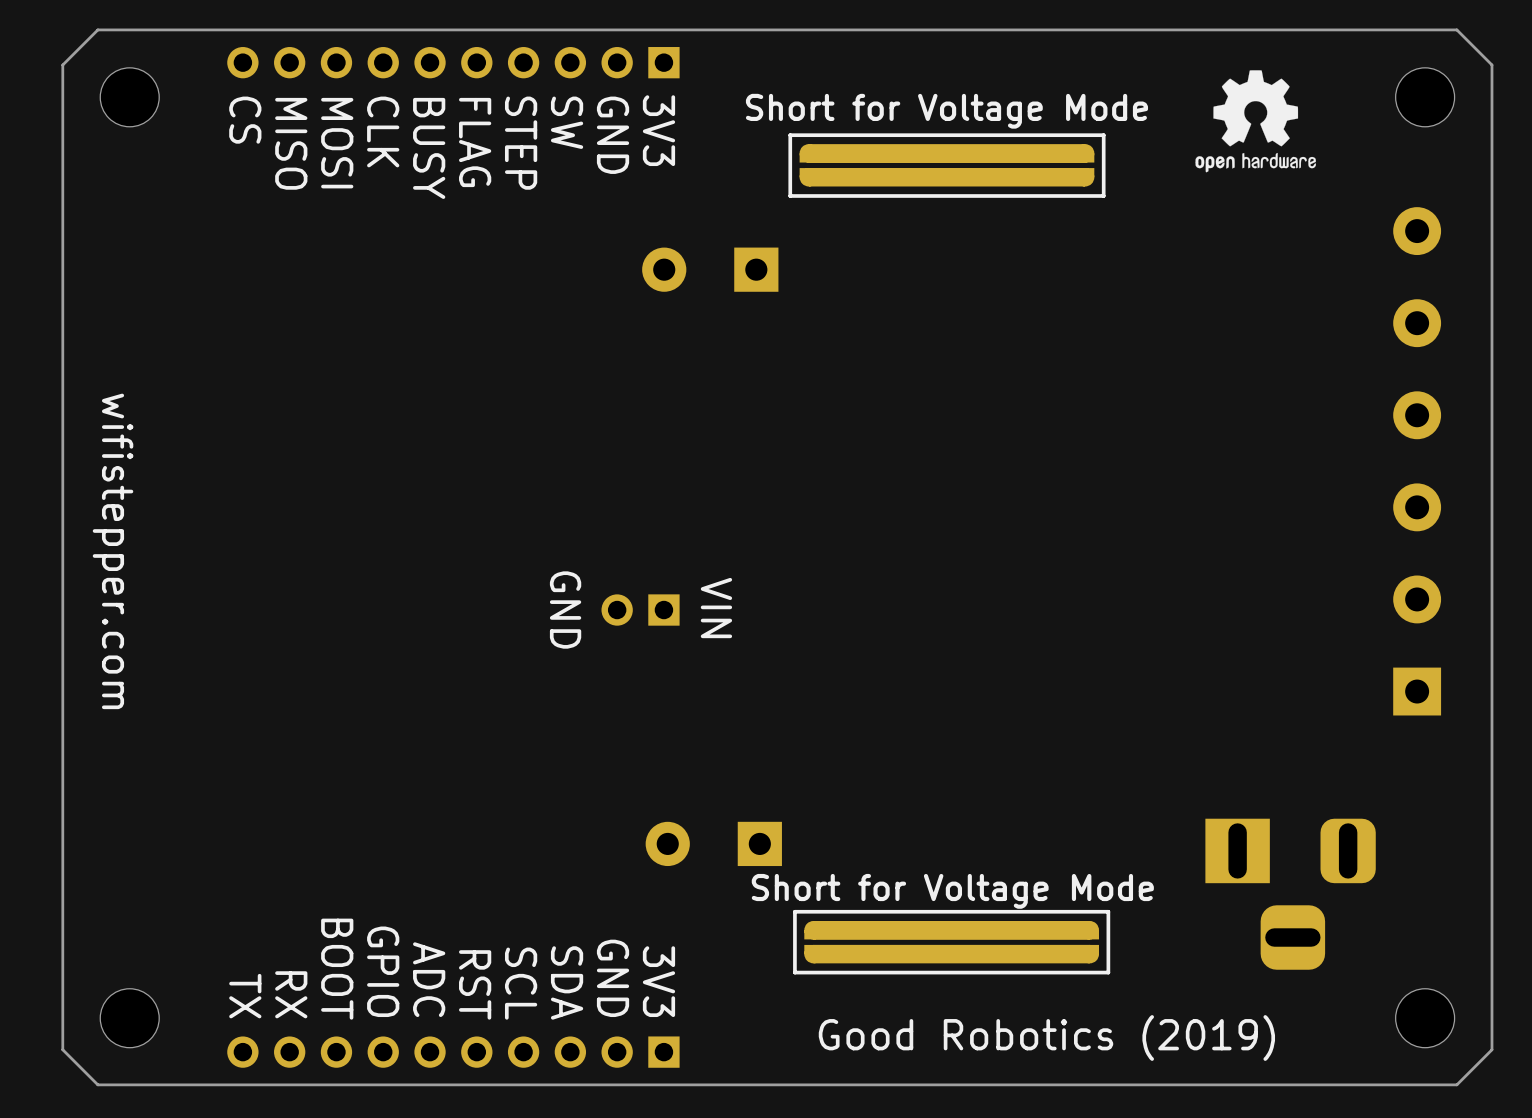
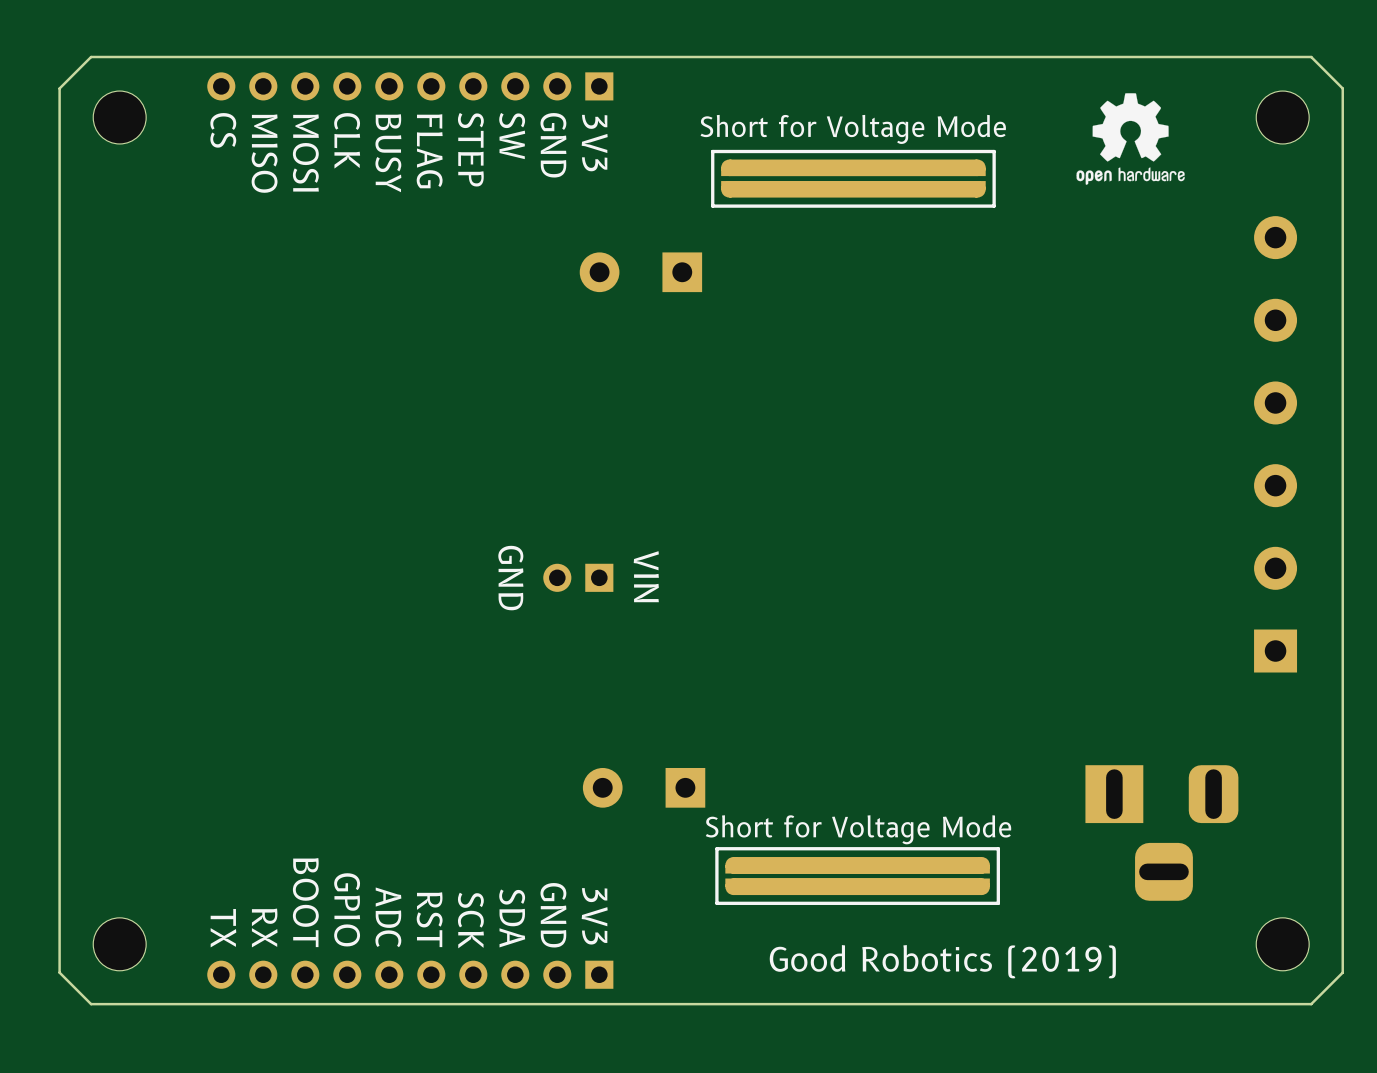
text: wifistepper.com (113, 551) -> none
text: SCL (521, 983) -> SCK (470, 920)

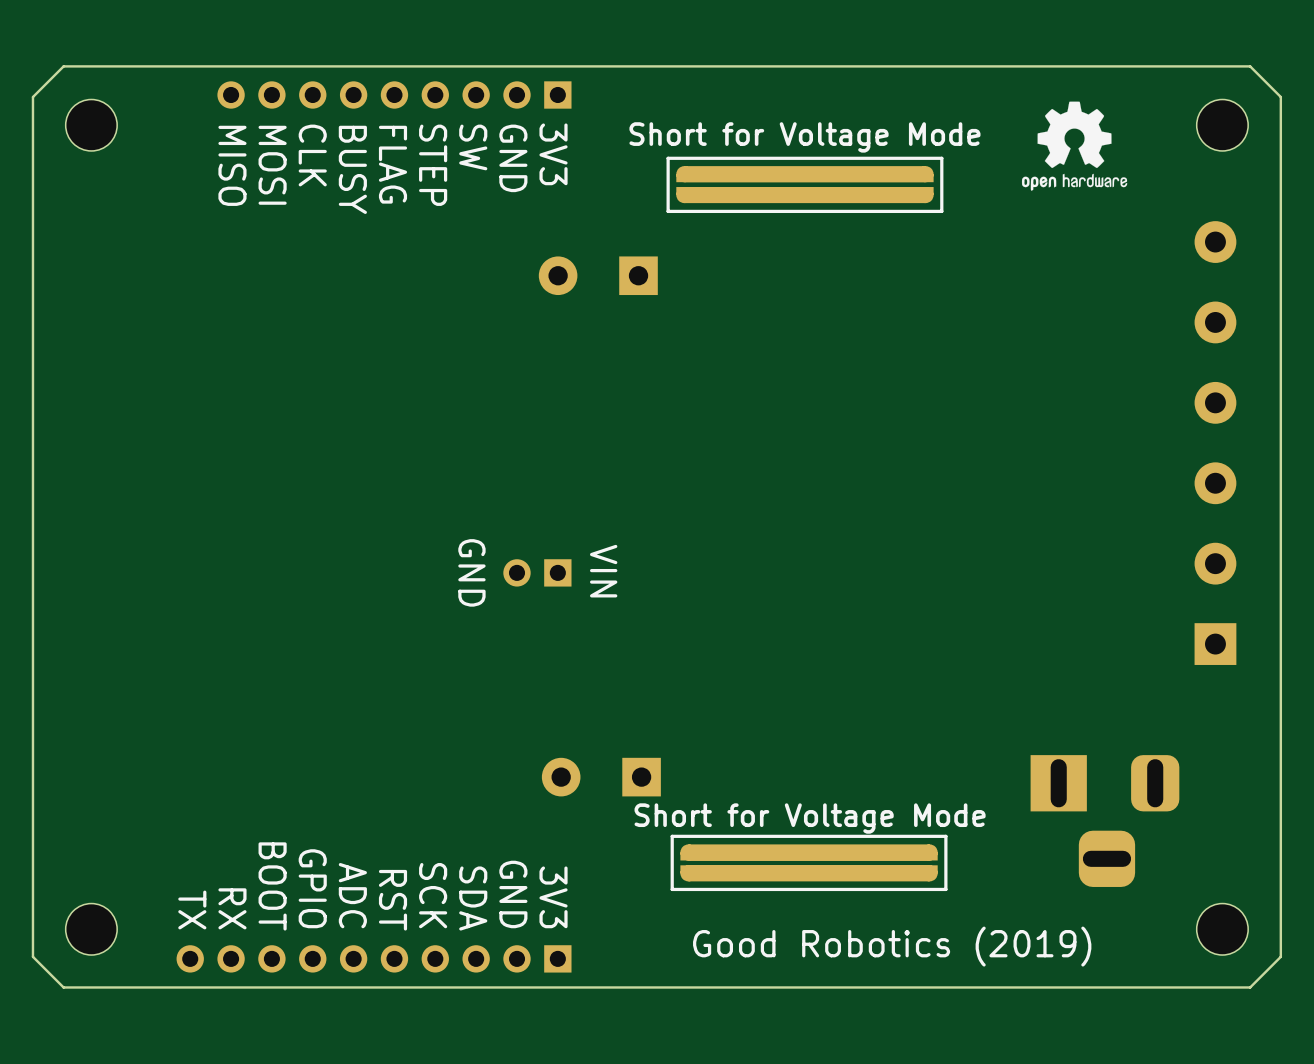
part: (410, 86) -> none
text: CS (223, 130) -> none

